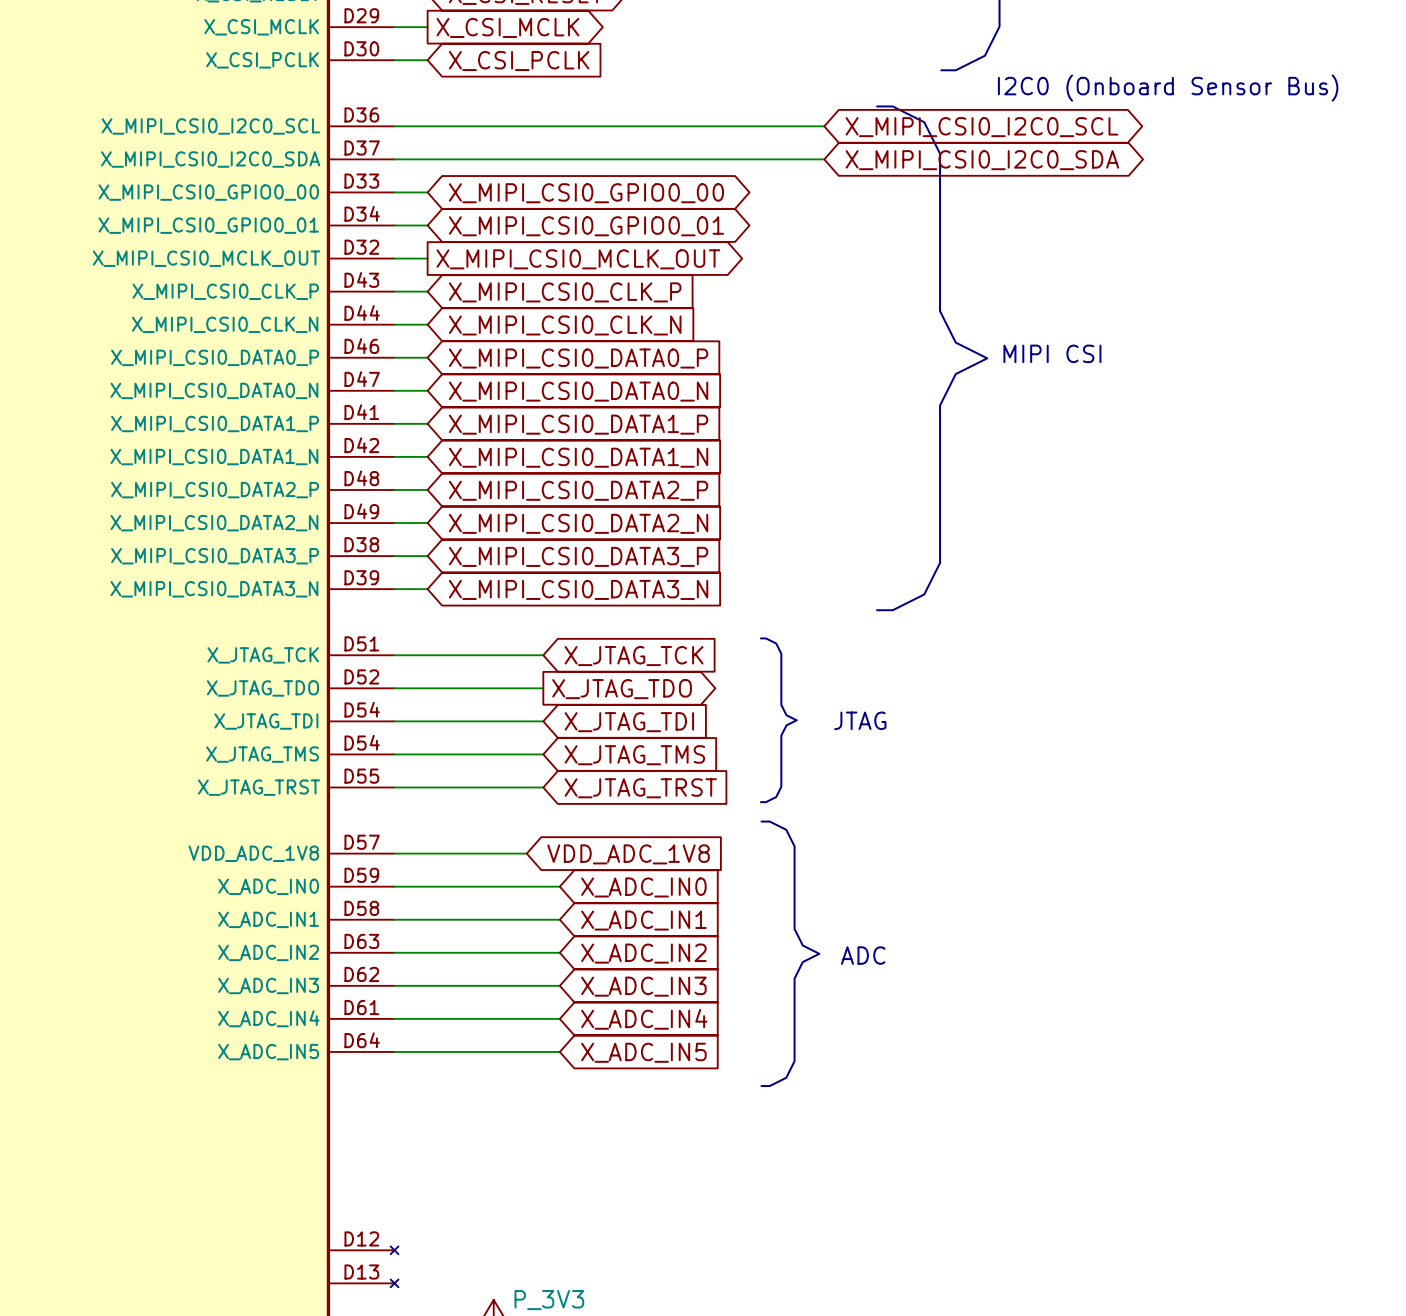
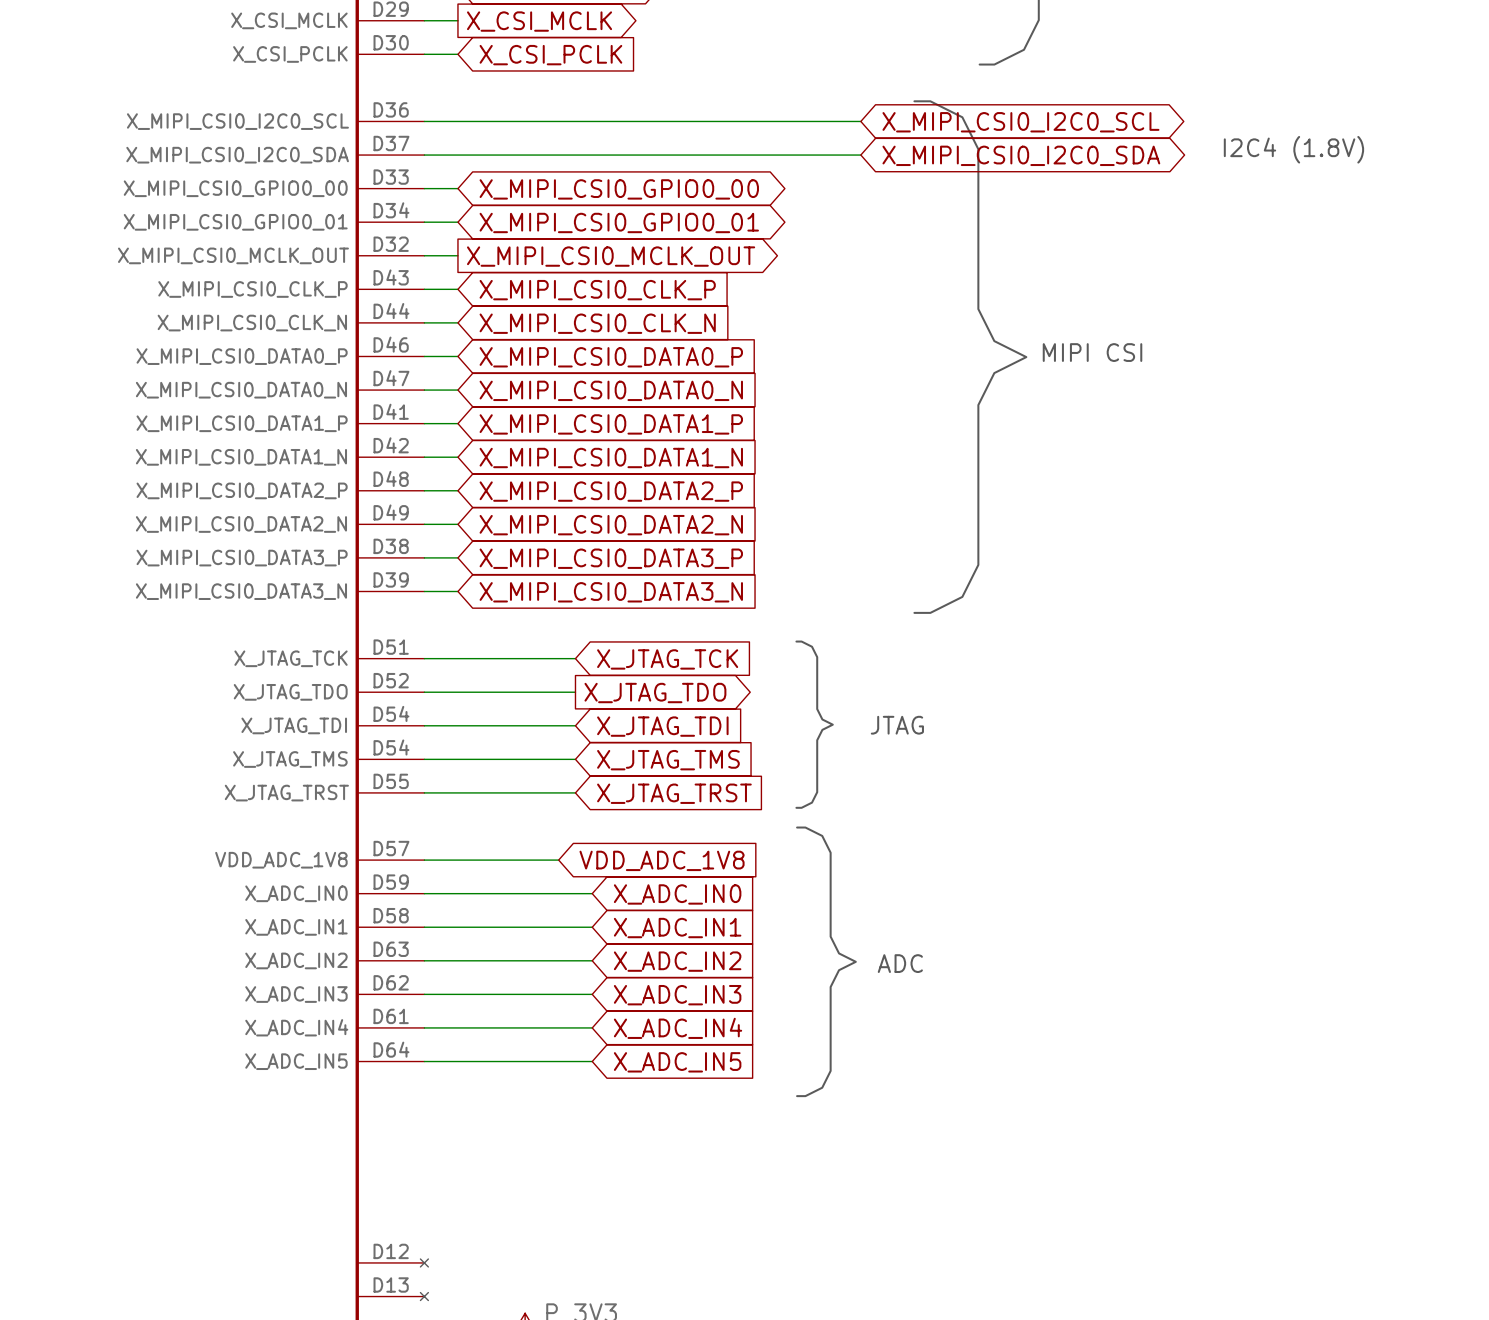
text: I2C0 (Onboard Sensor Bus) (1168, 88) -> none
text: none -> I2C4 (1.8V) (1293, 149)

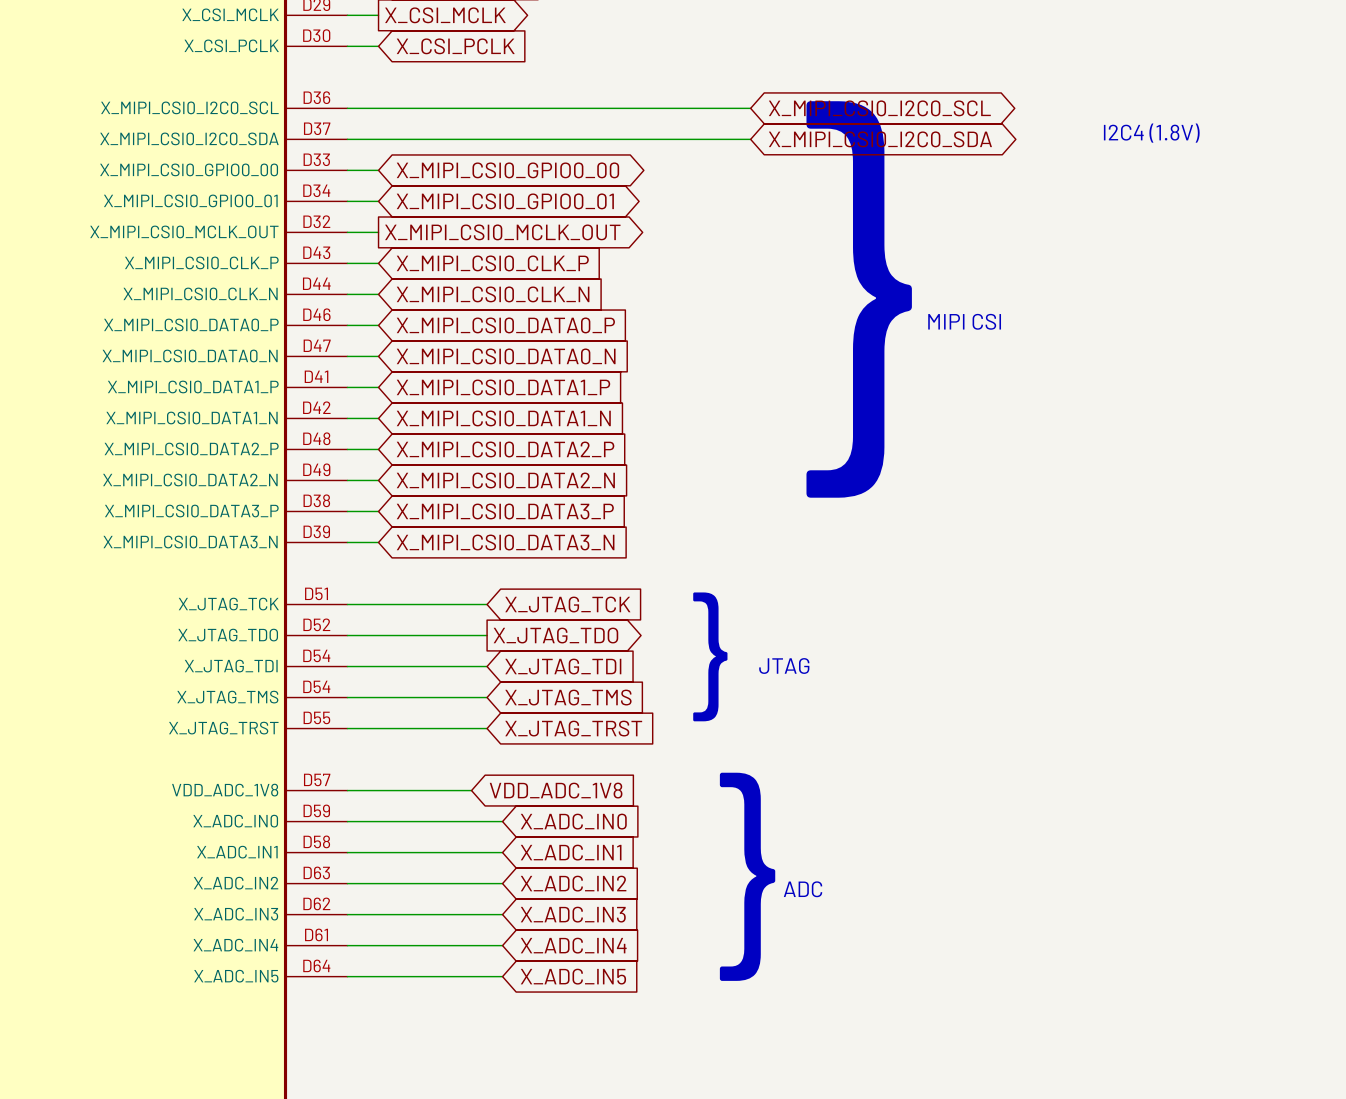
text position: } (826, 961) -> } (747, 876)
text position: ADC (900, 963) -> ADC (803, 889)

